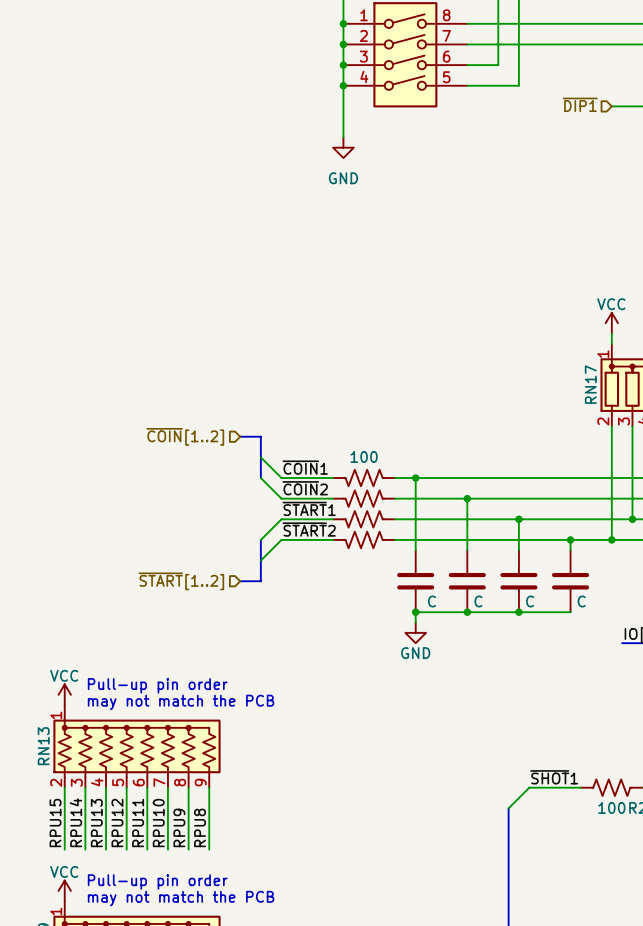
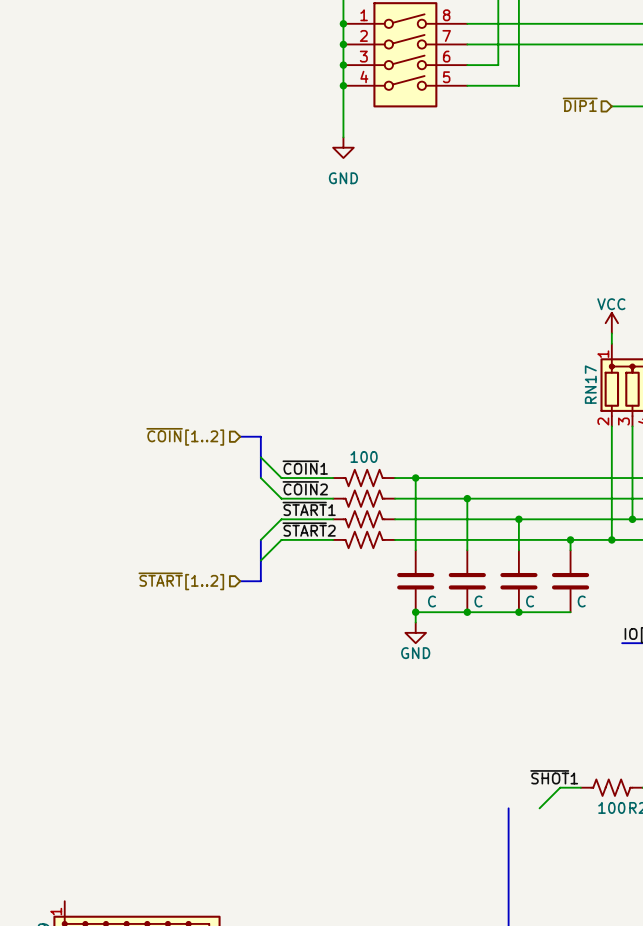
text: Pull-up pin order (157, 685) -> none
power symbol: VCC (64, 694) -> none
text: may not match the PCB (181, 702) -> none
RN13: (136, 746) -> none
wire: (64, 787) (64, 849) -> none
wire: (85, 787) (85, 849) -> none
wire: (106, 787) (106, 849) -> none
wire: (126, 787) (126, 849) -> none
wire: (147, 787) (147, 849) -> none
wire: (167, 787) (167, 849) -> none
wire: (188, 787) (188, 849) -> none
wire: (209, 787) (209, 849) -> none
wire: (560, 787) (529, 787) (508, 808) -> (560, 787) (539, 808)
label: RPU14 (75, 822) -> none
label: RPU15 (55, 823) -> none
label: RPU13 (96, 823) -> none
label: RPU12 (117, 823) -> none
label: RPU11 (138, 823) -> none
label: RPU10 (158, 823) -> none
label: RPU9 (179, 827) -> none
label: RPU8 (200, 827) -> none
text: Pull-up pin order (157, 881) -> none
power symbol: VCC (64, 890) -> none
text: may not match the PCB (181, 898) -> none

